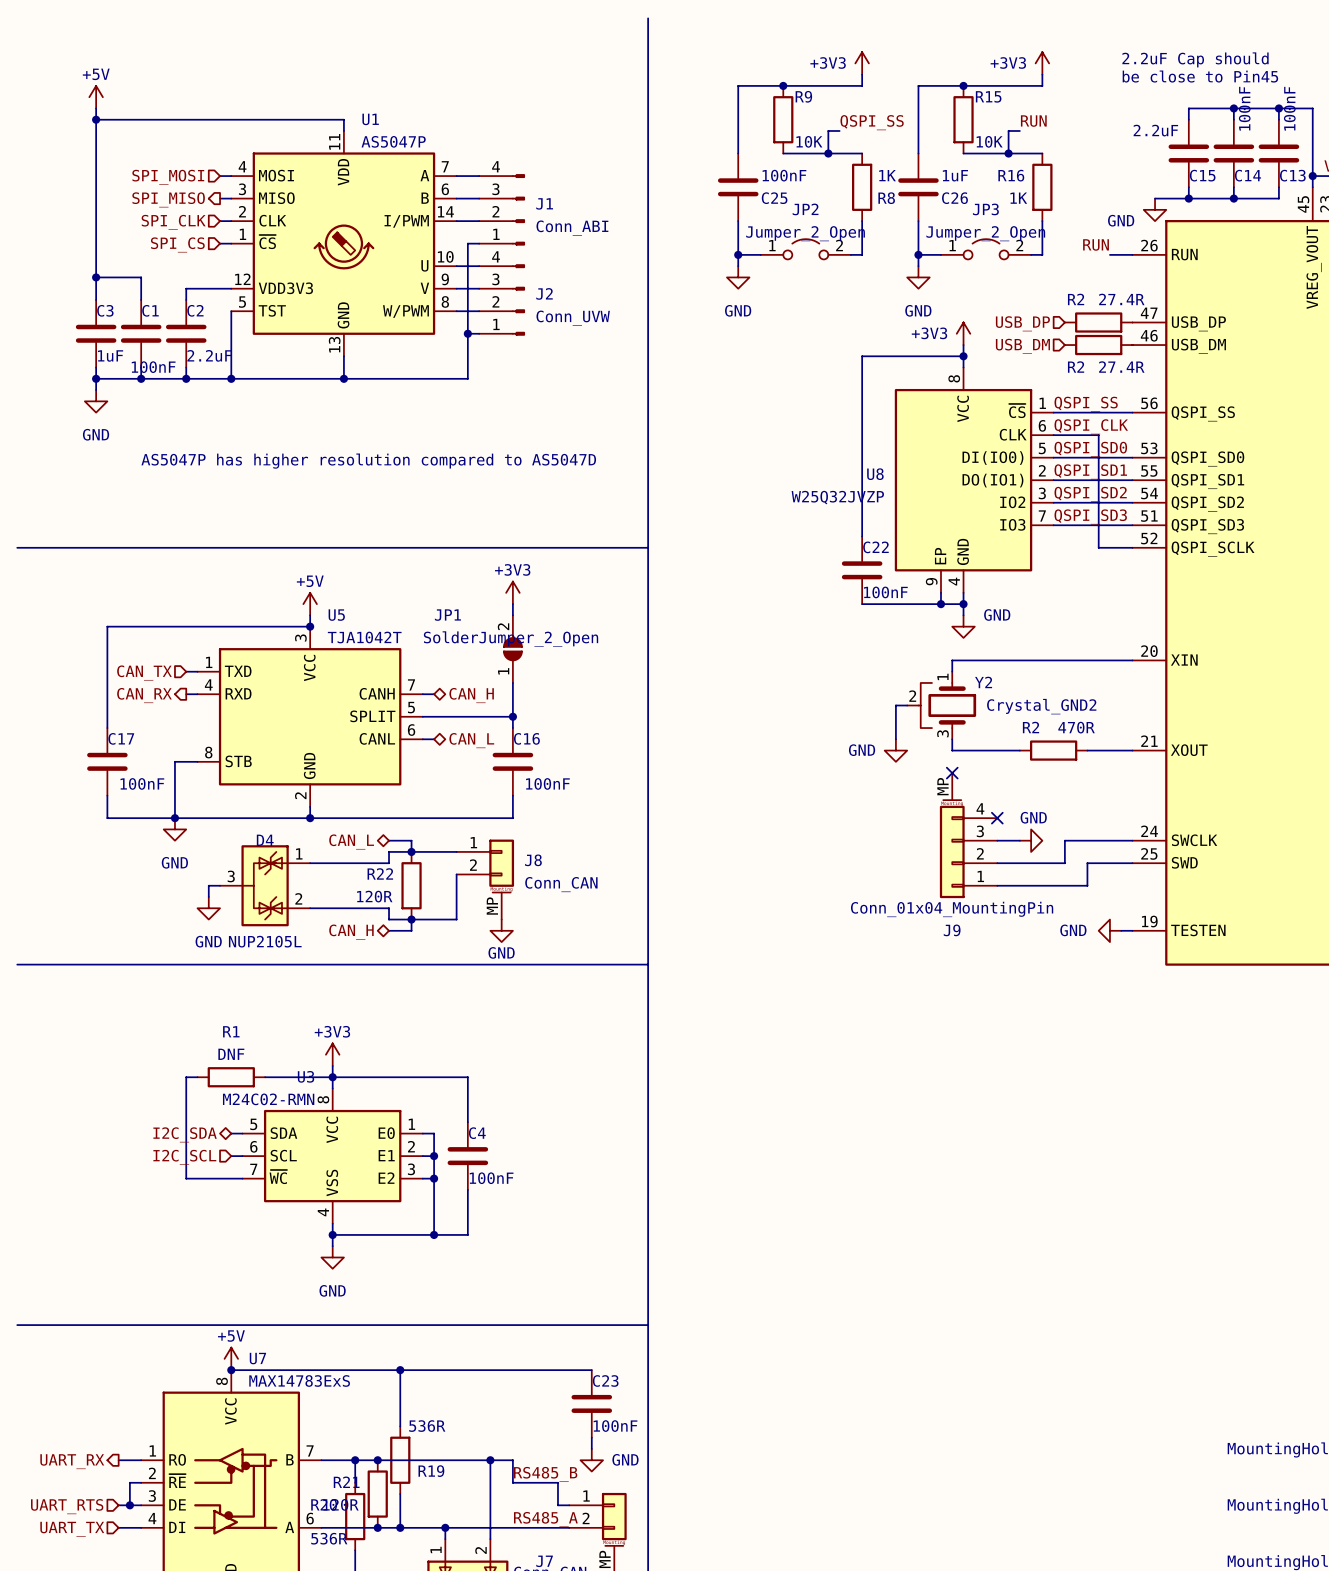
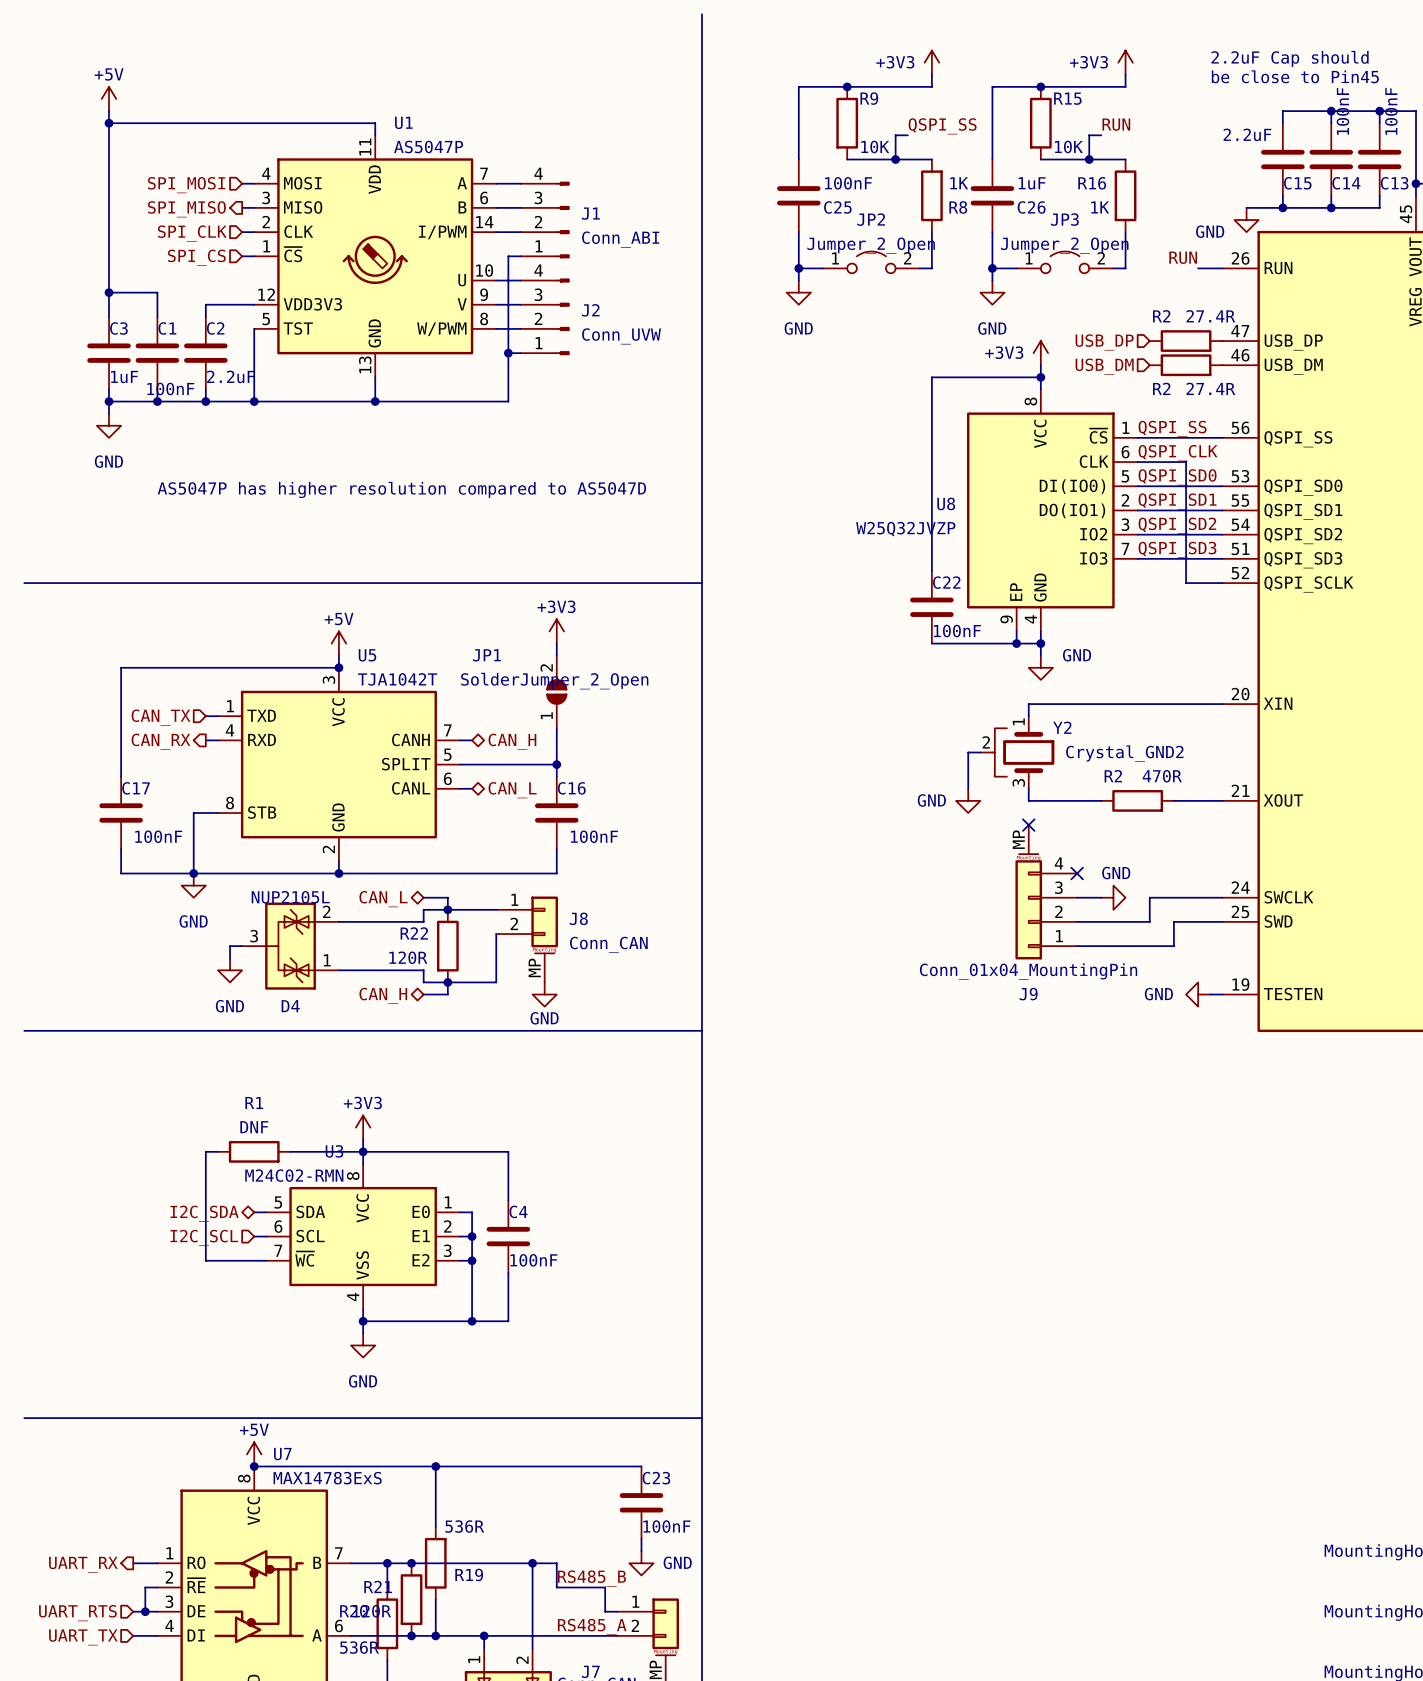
D4 flip: as is (265, 885) -> up-down (290, 946)

